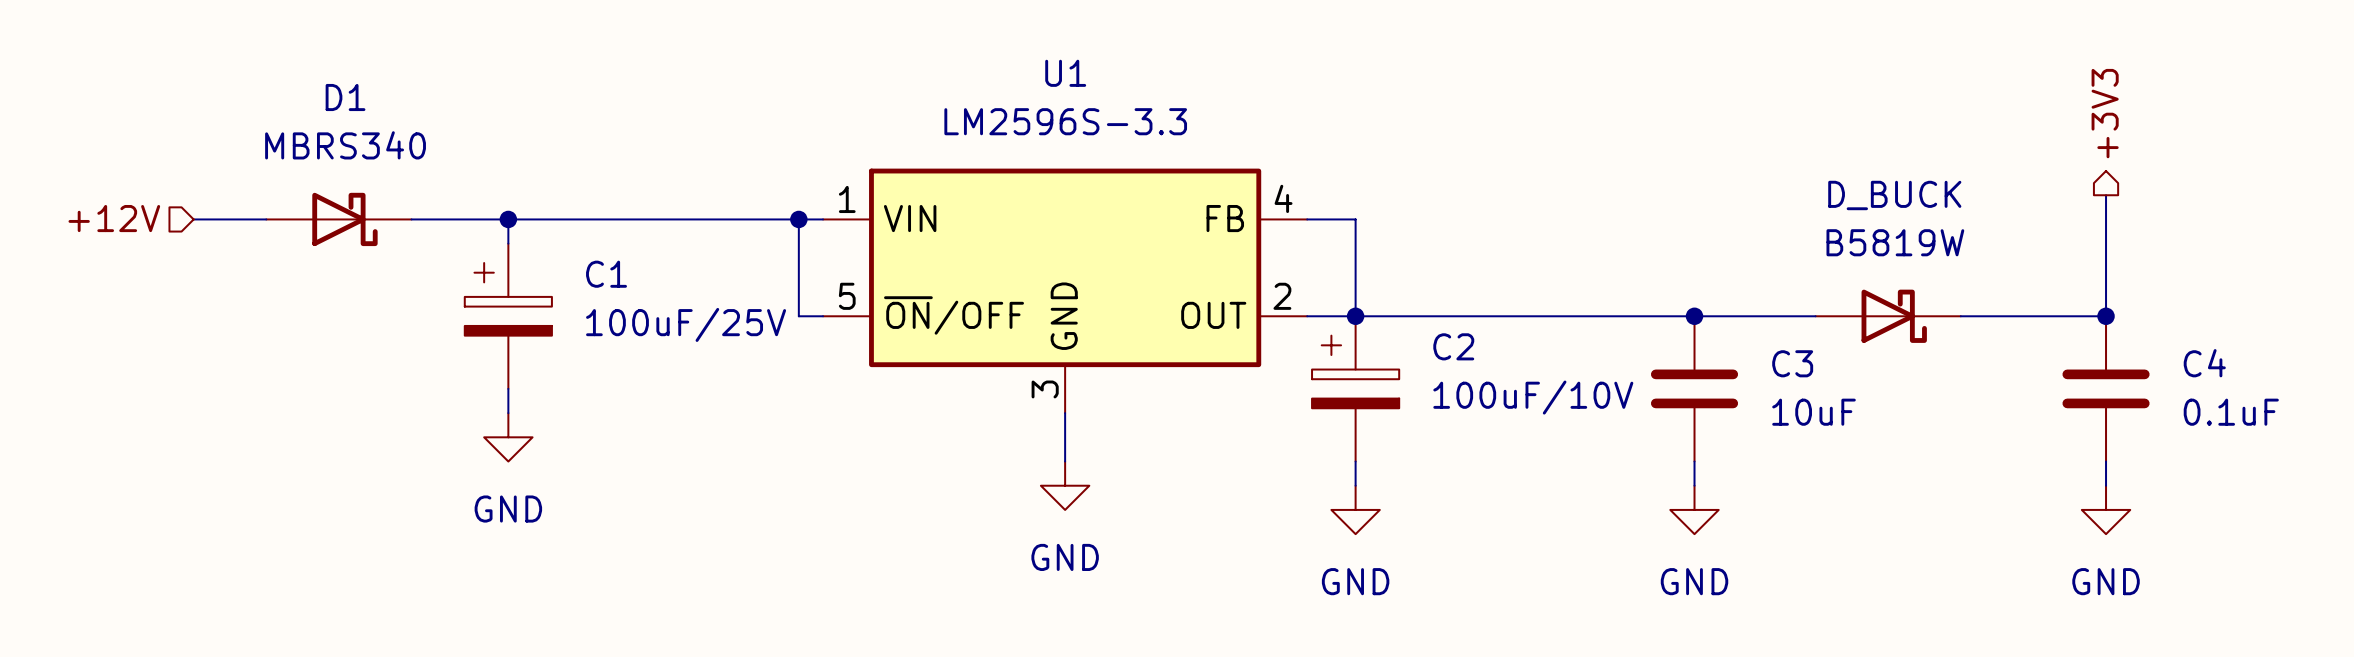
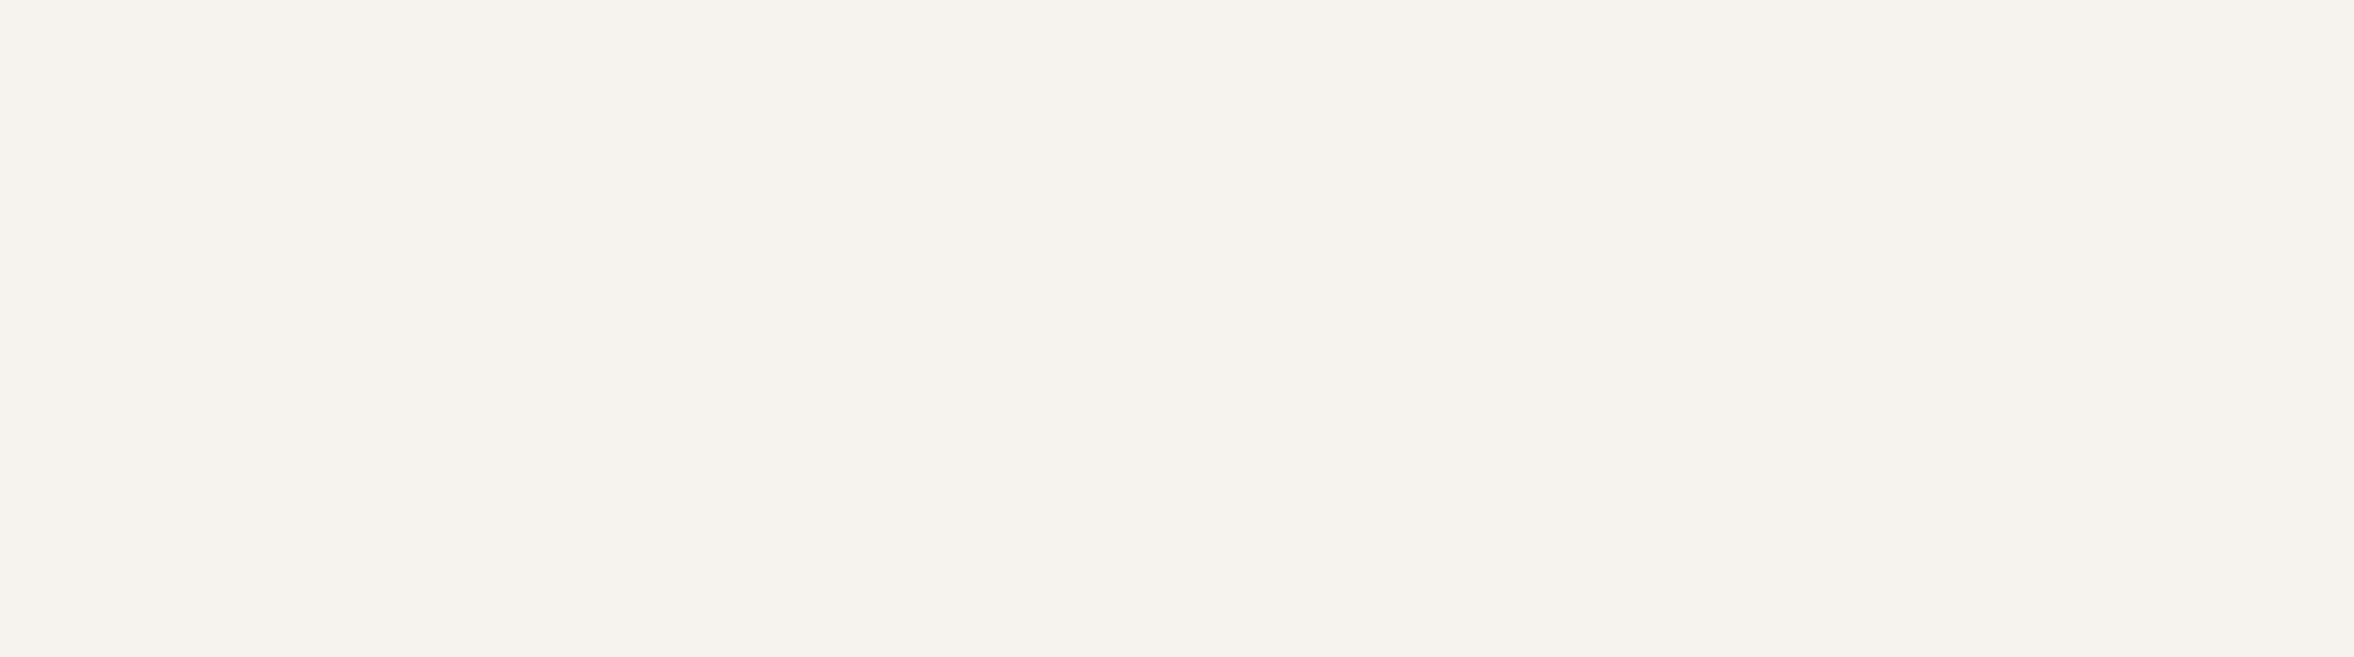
hierarchical label: +3V3 (2105, 113) -> none
wire: (2106, 195) (2106, 316) (1960, 316) -> none
hierarchical label: +12V (114, 218) -> none
wire: (193, 219) (266, 219) -> none
D1: MBRS340 (338, 219) -> none
wire: (411, 219) (823, 219) -> none
wire: (508, 219) (508, 243) -> none
junction: (508, 219) -> none
wire: (798, 219) (798, 316) (823, 316) -> none
junction: (798, 219) -> none
wire: (1307, 219) (1355, 219) (1355, 316) -> none
U1: LM2596S-3.3 (1065, 290) -> none
C1: 100uF/25V (508, 316) -> none
wire: (1307, 316) (1815, 316) -> none
junction: (1355, 316) -> none
junction: (1694, 316) -> none
D_BUCK: B5819W (1888, 316) -> none
junction: (2106, 316) -> none
wire: (508, 388) (508, 413) -> none
C2: 100uF/10V (1355, 388) -> none
C3: 10uF (1694, 388) -> none
C4: 0.1uF (2106, 388) -> none
wire: (1065, 413) (1065, 461) -> none
power symbol: GND (508, 437) -> none
wire: (1355, 461) (1355, 485) -> none
wire: (1694, 461) (1694, 485) -> none
wire: (2106, 461) (2106, 485) -> none
power symbol: GND (1065, 485) -> none
power symbol: GND (1355, 509) -> none
power symbol: GND (1694, 509) -> none
power symbol: GND (2106, 509) -> none

